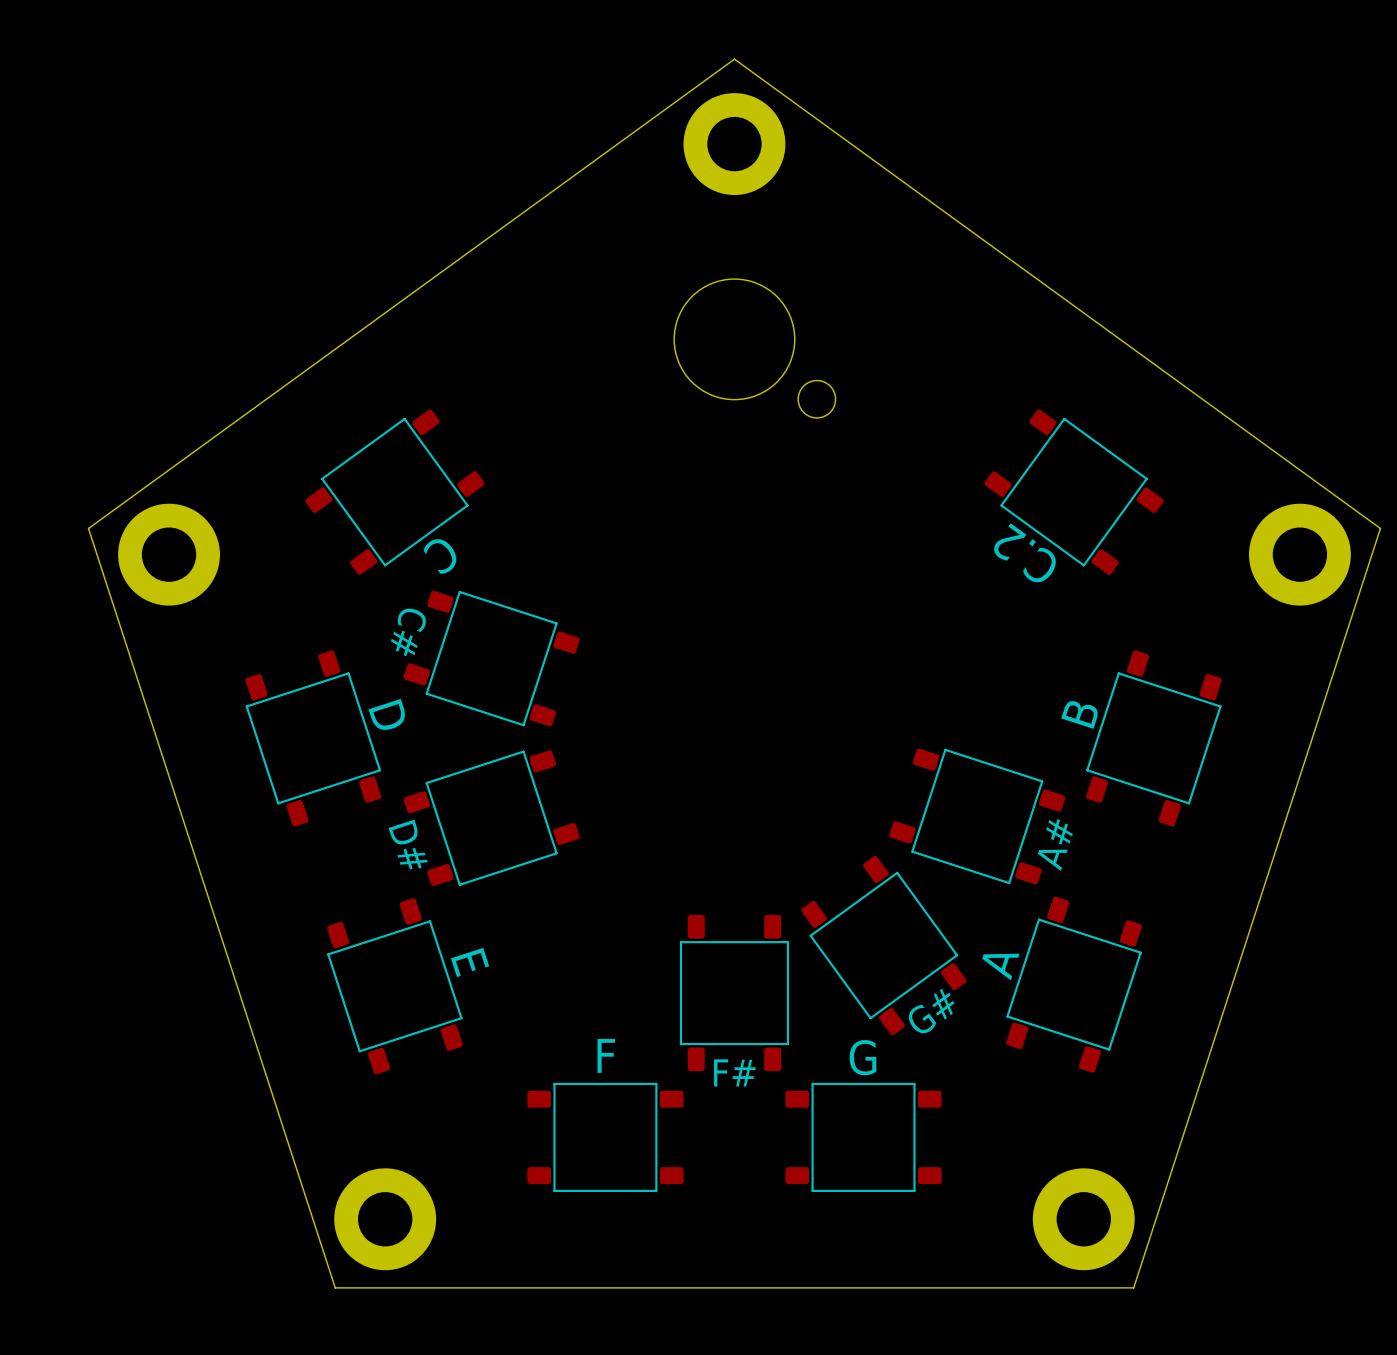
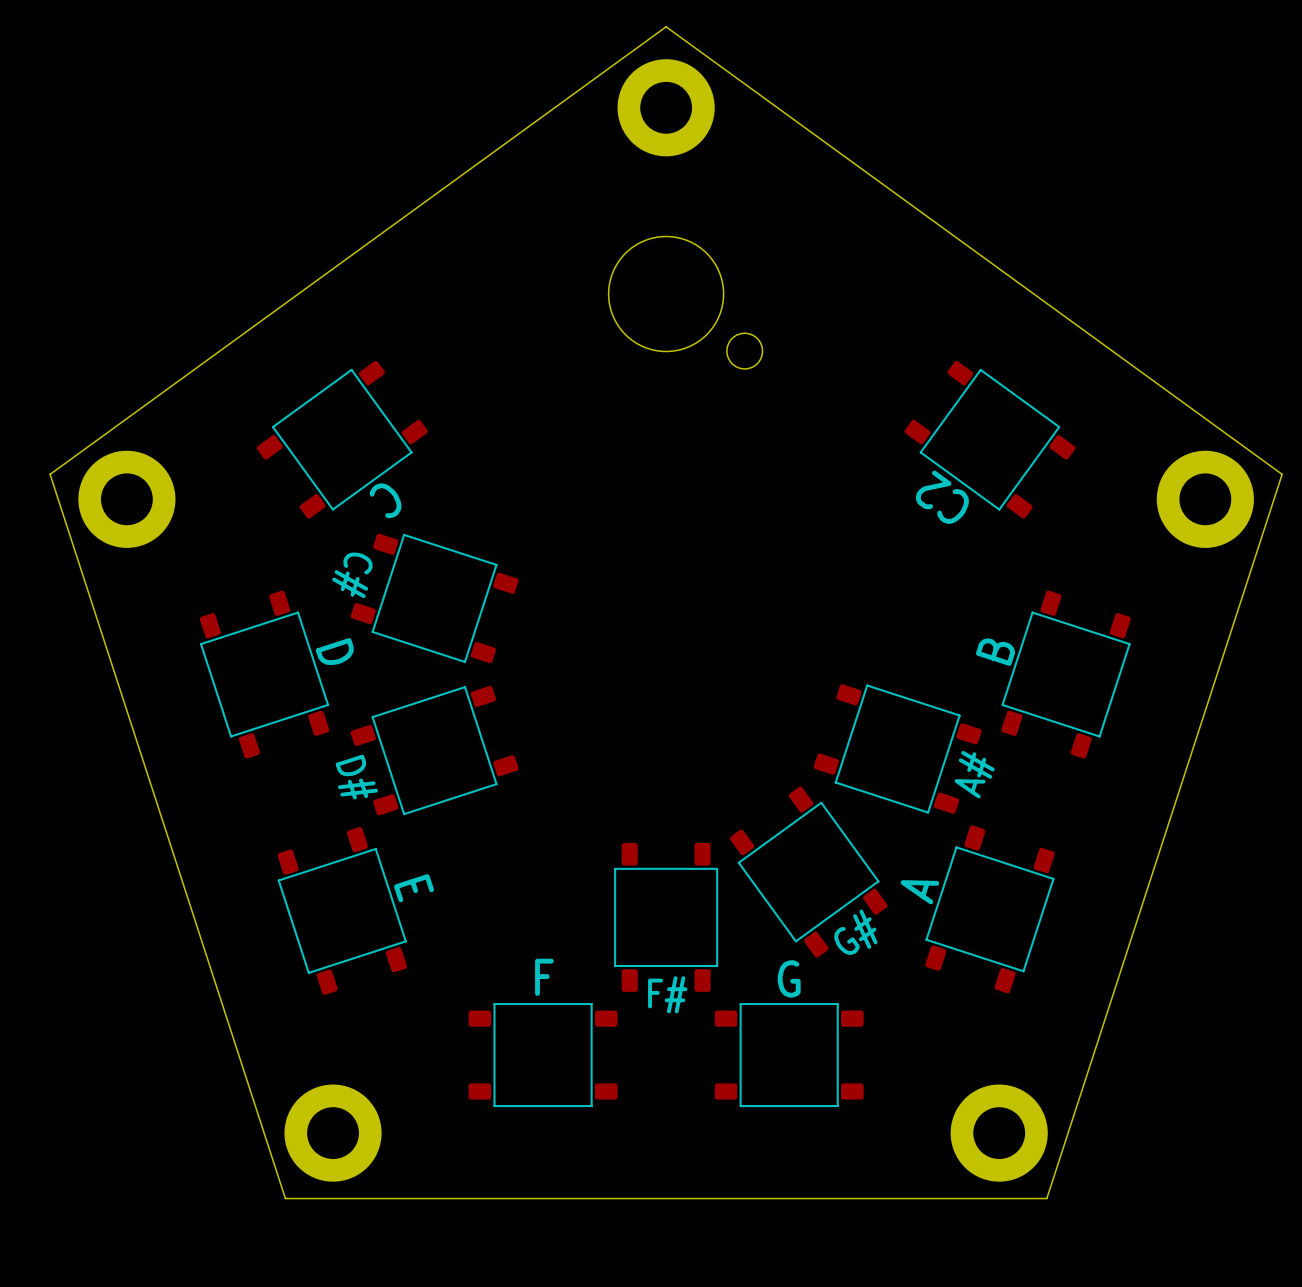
C.2 name: C.2 (1024, 553) -> C2 (942, 497)

